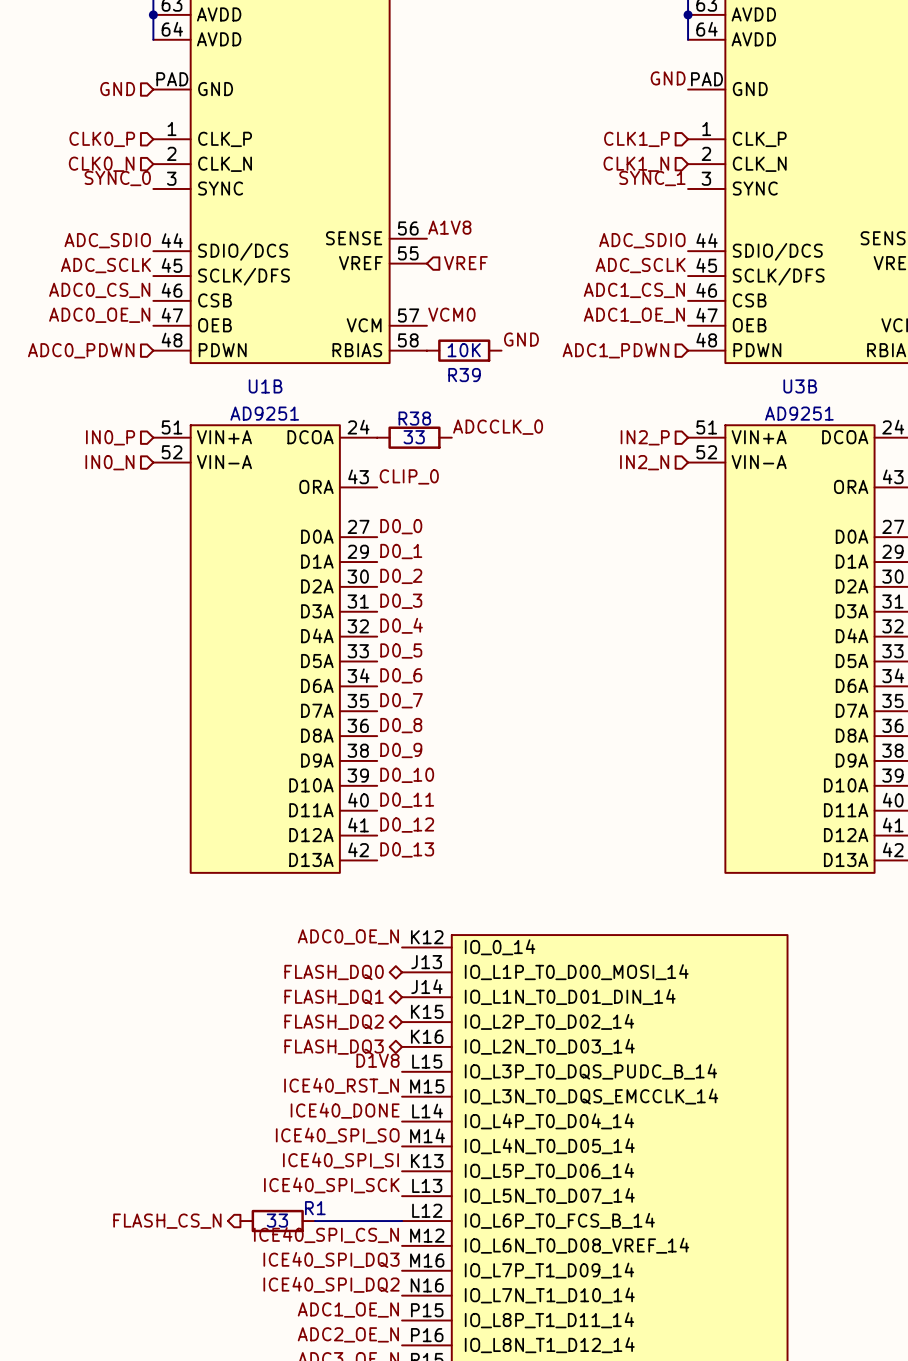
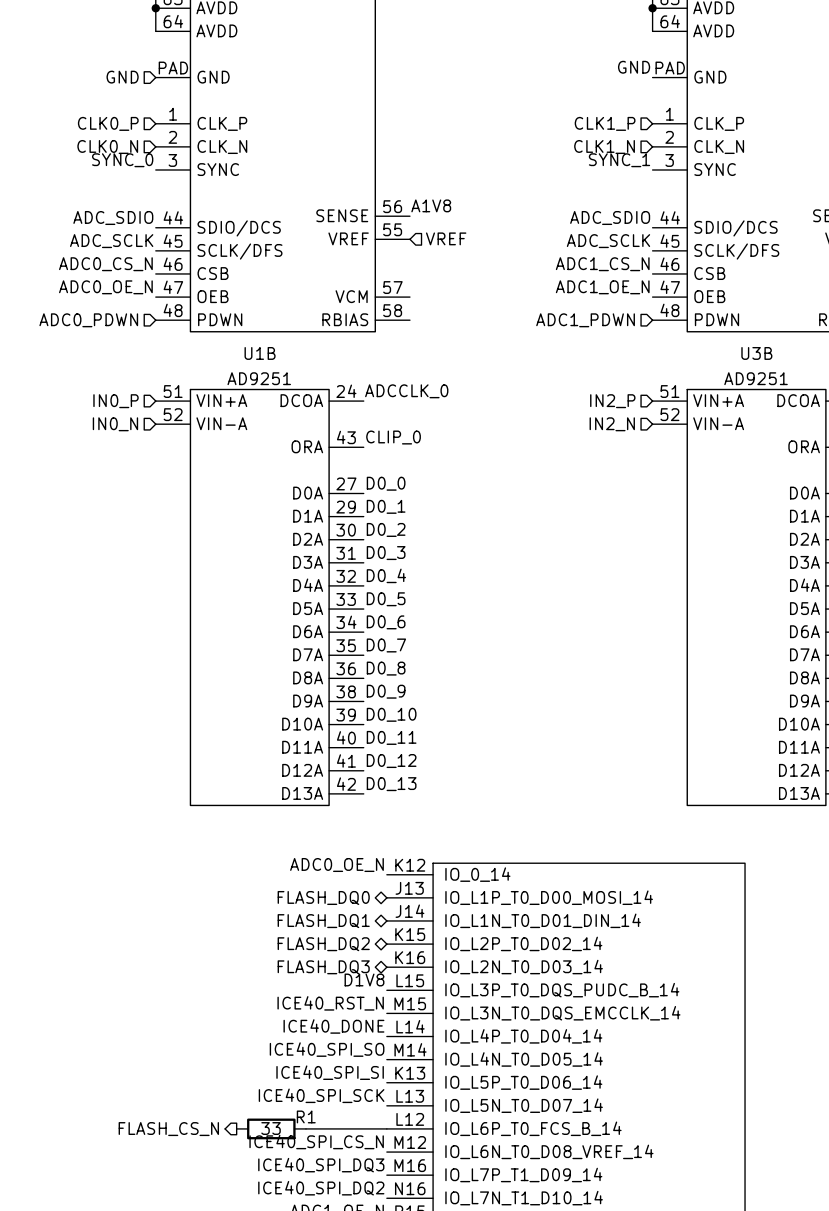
label: VCM0 (451, 314) -> none
label: GND (521, 339) -> none
R39: 10K (464, 350) -> none
label position: ADCCLK_0 (498, 427) -> ADCCLK_0 (406, 391)
R38: 33 (414, 437) -> none

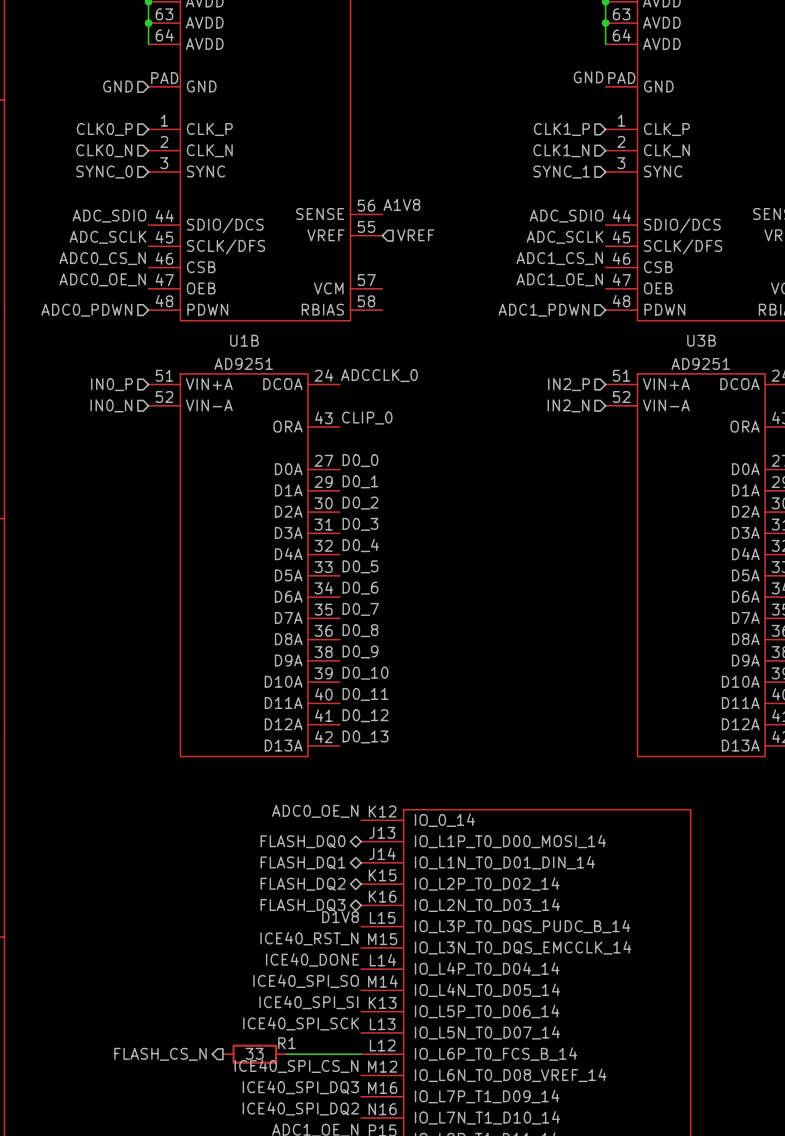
label: SYNC_0 (122, 160) -> none
label: SYNC_1 (619, 160) -> none
hierarchical label: none -> SYNC_0 (104, 172)
hierarchical label: none -> SYNC_1 (561, 172)

